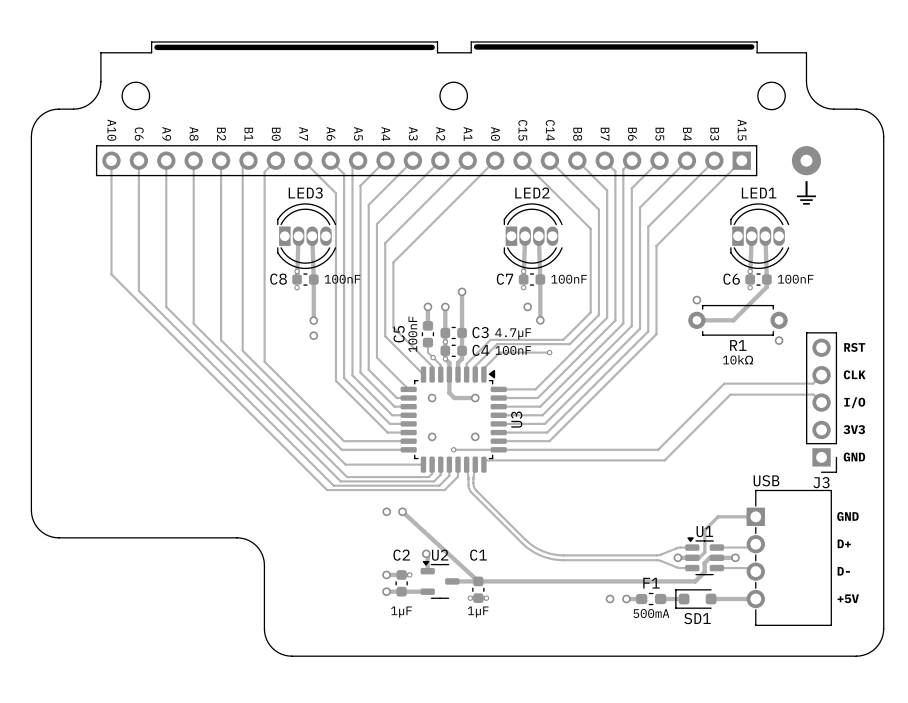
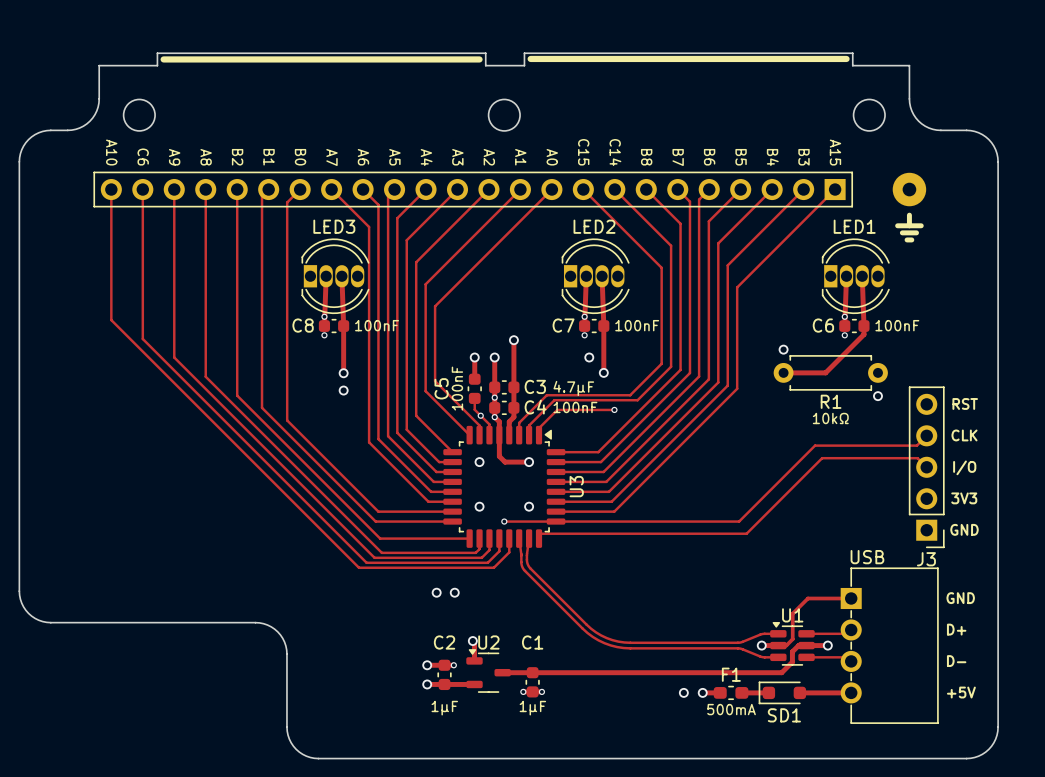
via: (386, 511) -> none
via: none -> (436, 592)
track: (402, 511) (478, 581) -> none
via: (402, 511) -> none
via: none -> (454, 592)

